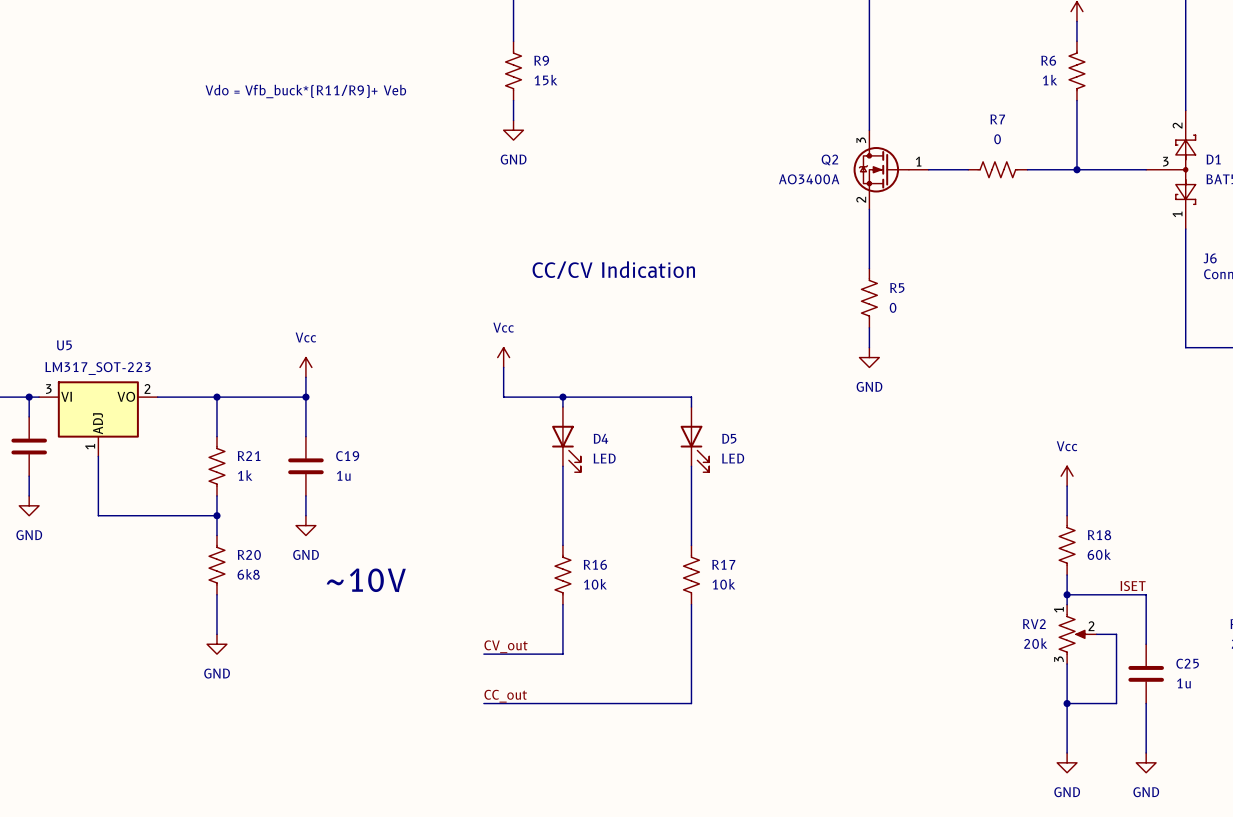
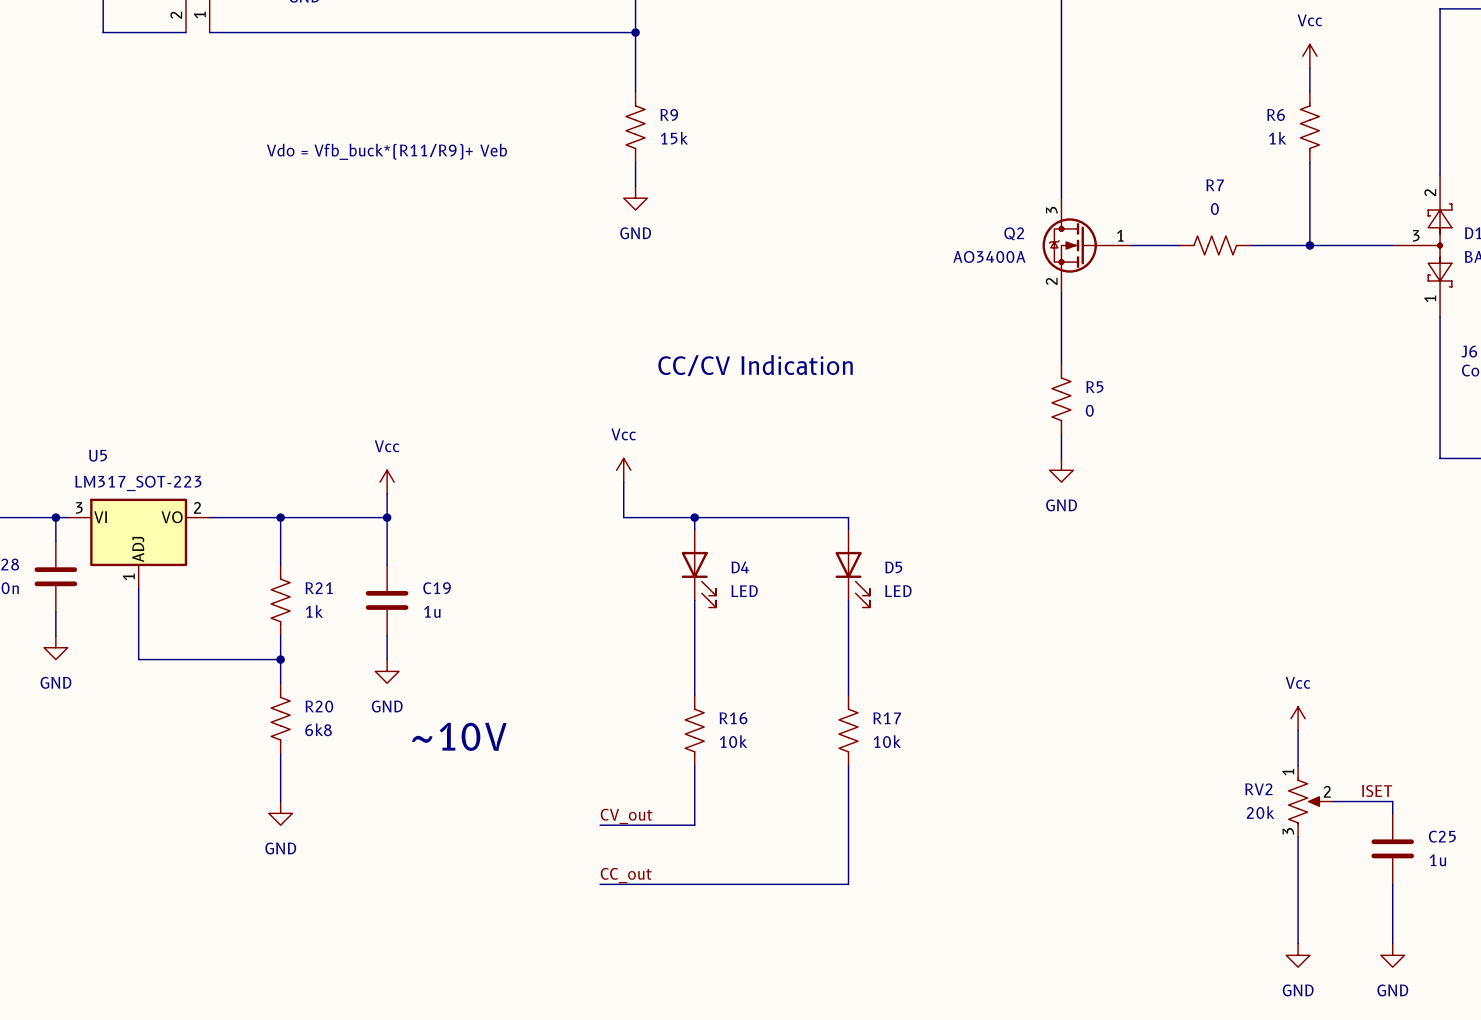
power symbol position: Vcc (1067, 476) -> Vcc (1298, 718)
wire: (1067, 486) (1067, 515) -> none
R18: 60k (1067, 545) -> none
label position: ISET (1133, 586) -> ISET (1377, 791)
wire: (1067, 594) (1146, 594) (1146, 634) -> (1357, 801) (1392, 801)
junction: (1067, 594) -> none
wire: (1116, 634) (1116, 703) (1067, 703) -> none
junction: (1067, 703) -> none

